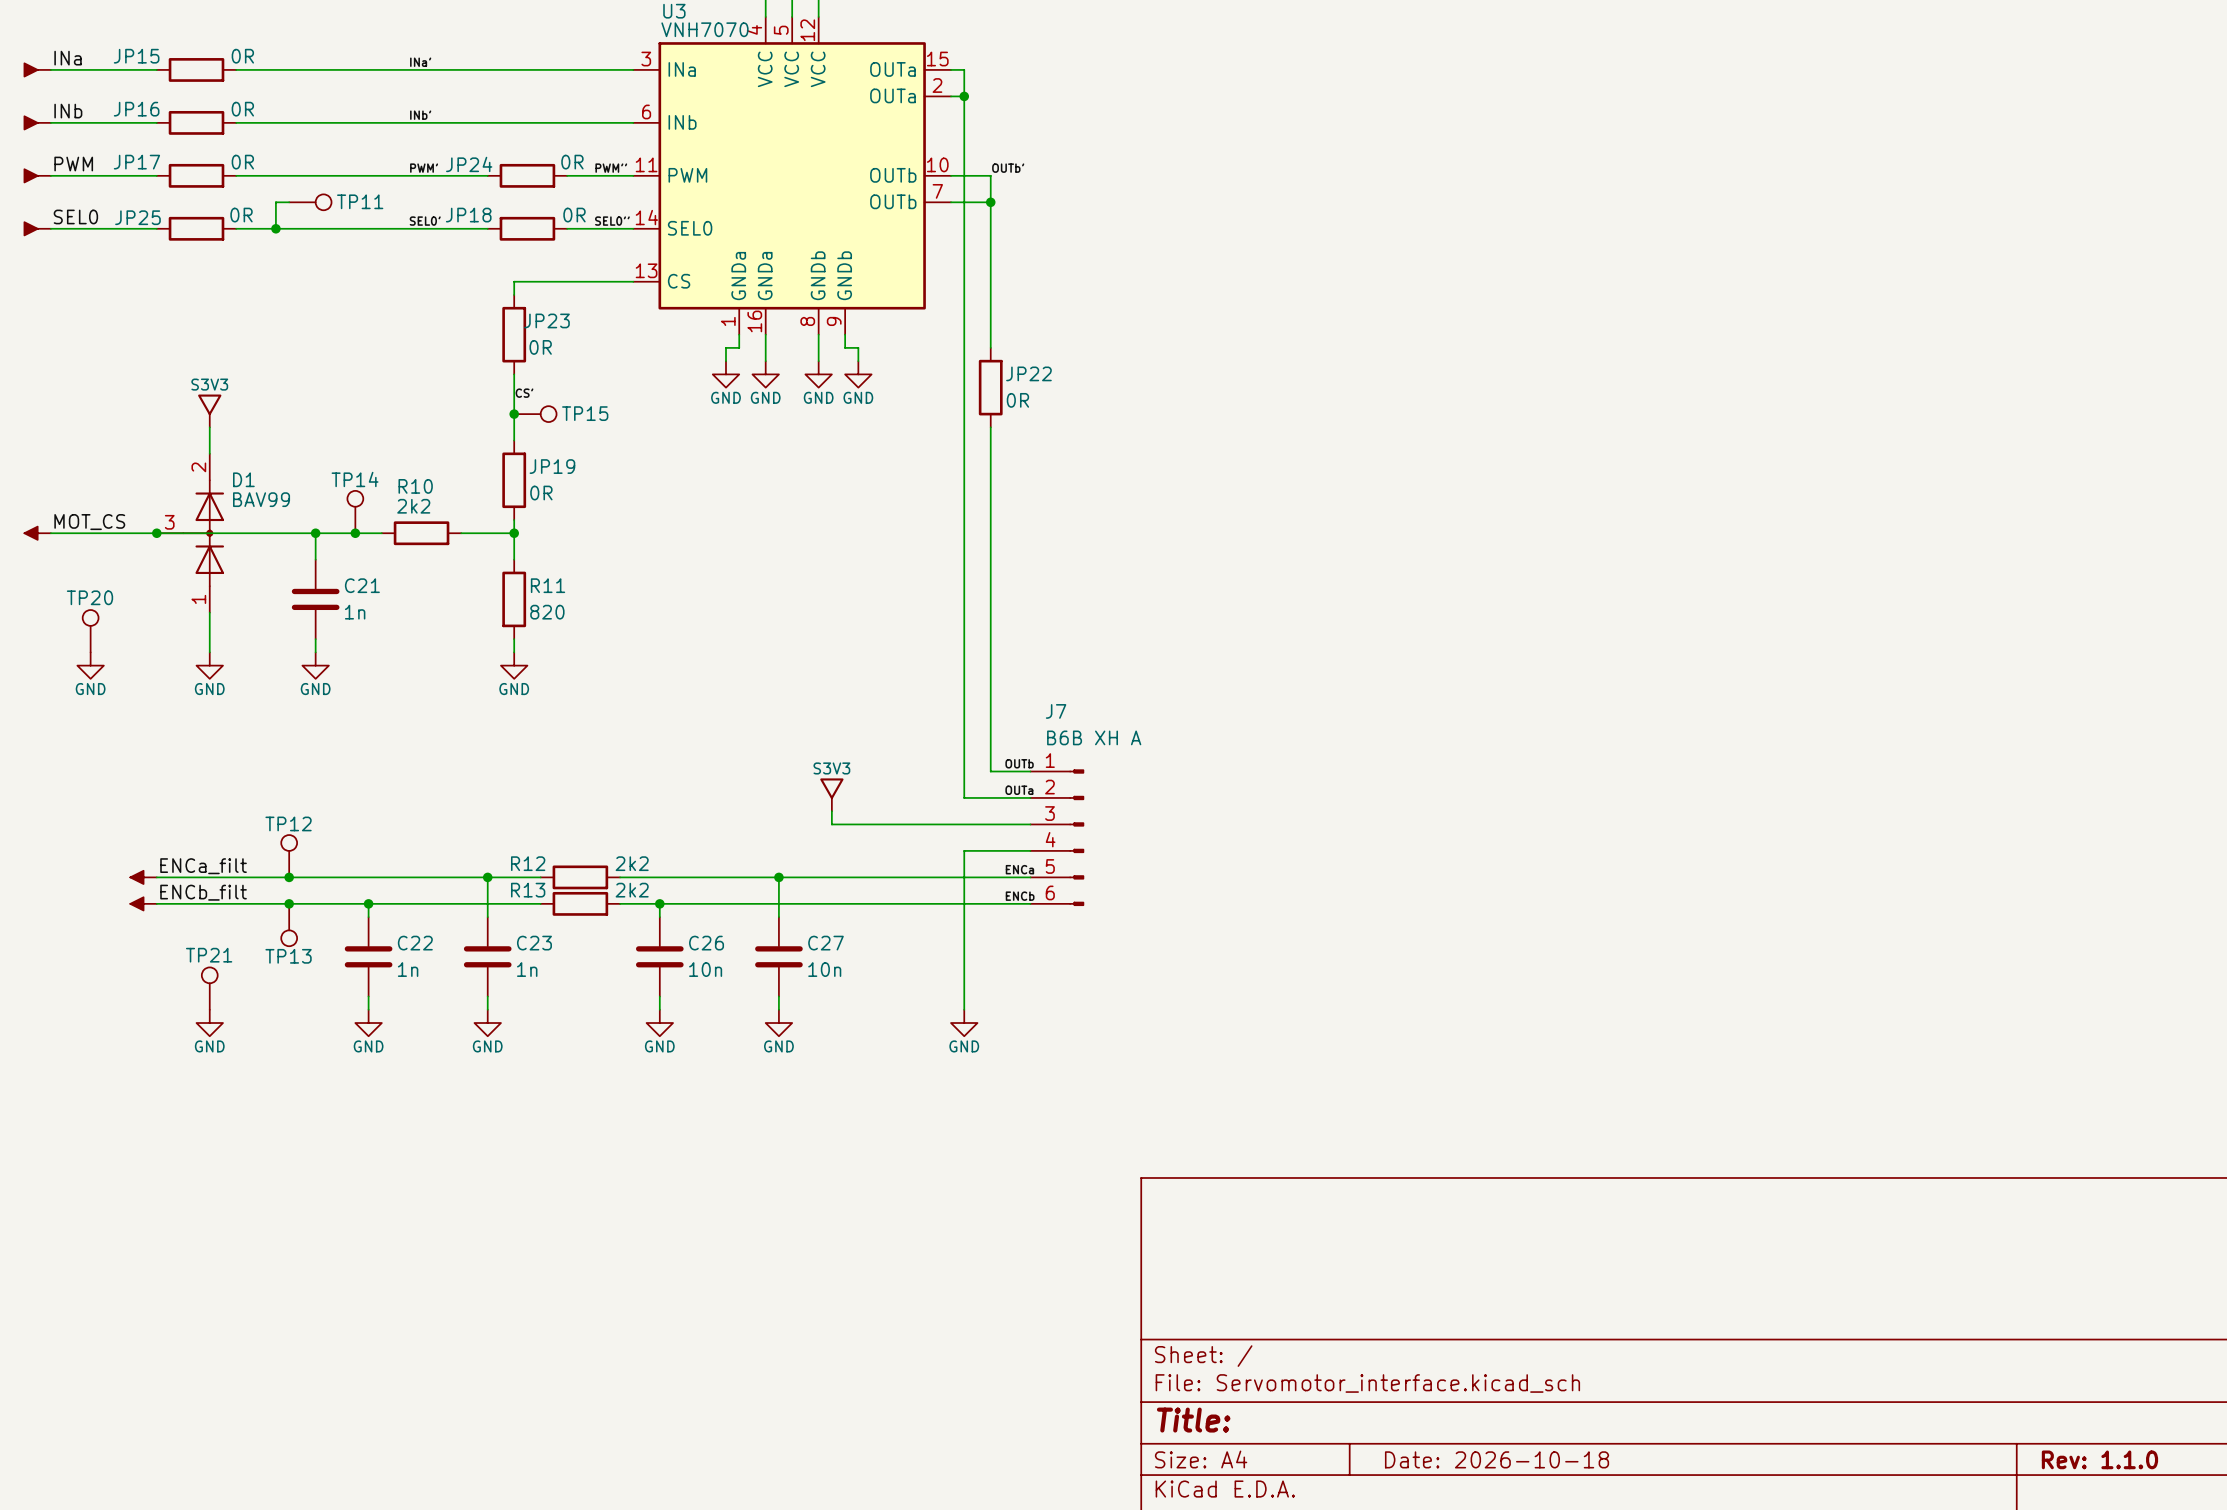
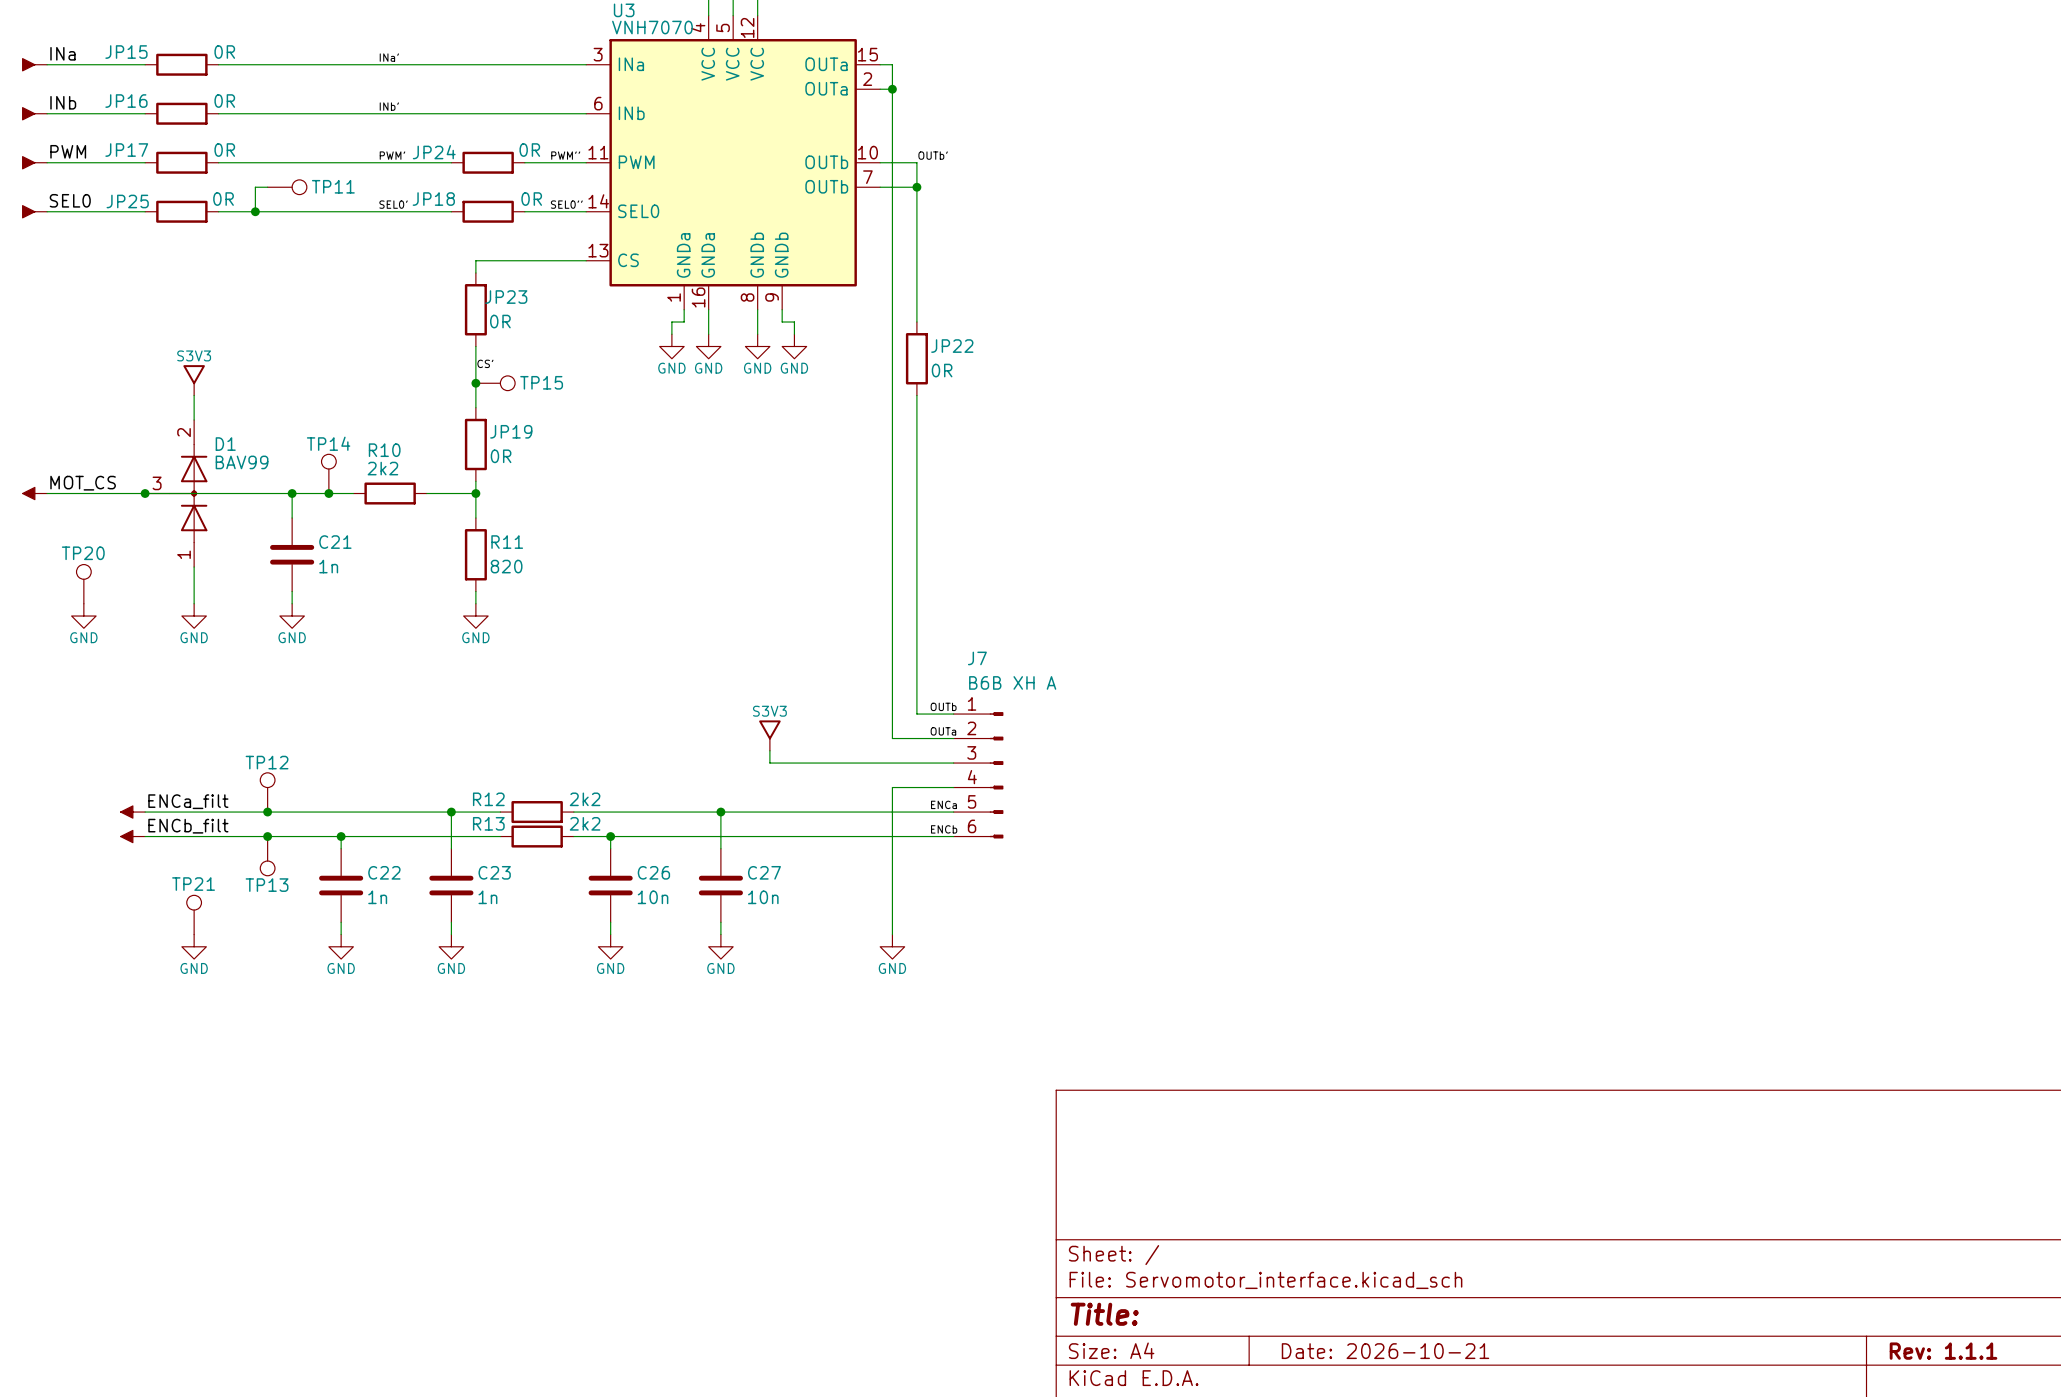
title block: Date: 2026-10-18 (1497, 1459) -> Date: 2026-10-21 (1385, 1351)
title block: Rev: 1.1.0 (2099, 1459) -> Rev: 1.1.1 (1943, 1351)

